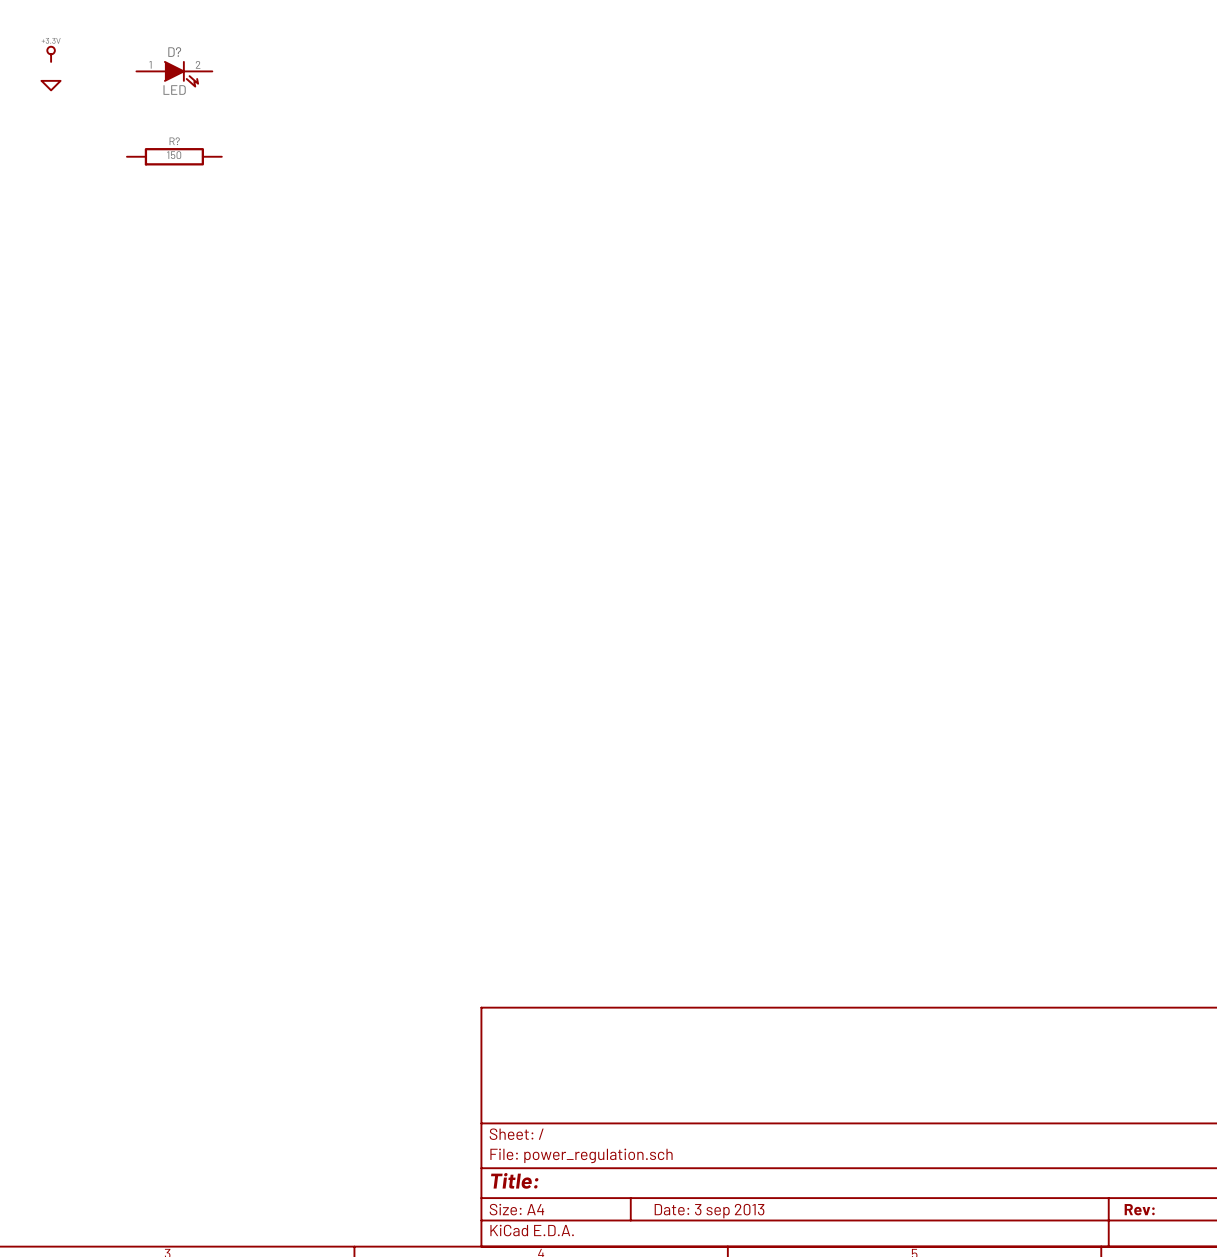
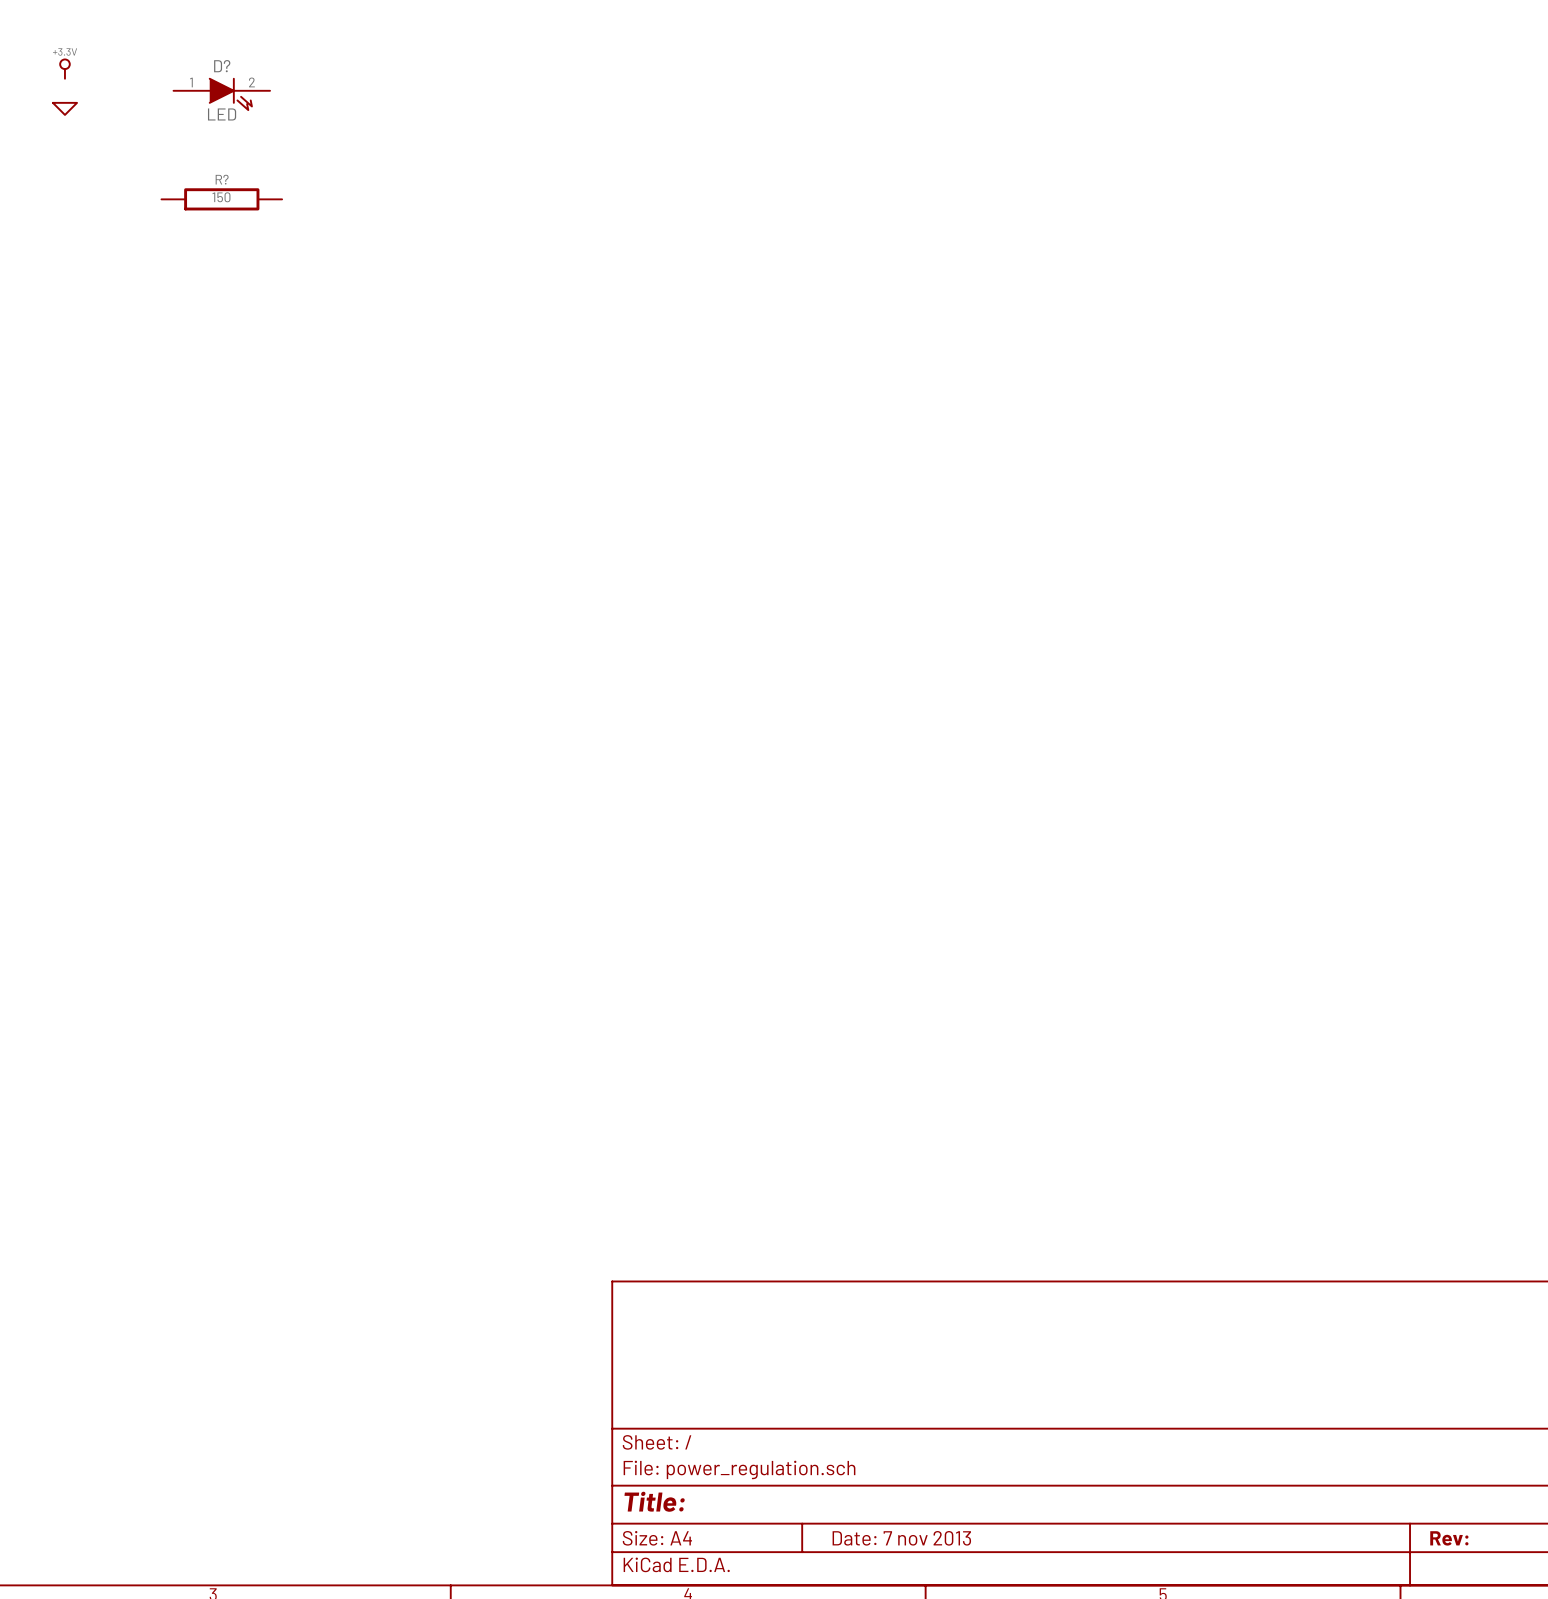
title block: Date: 3 sep 2013 (709, 1211) -> Date: 7 nov 2013 (901, 1538)

